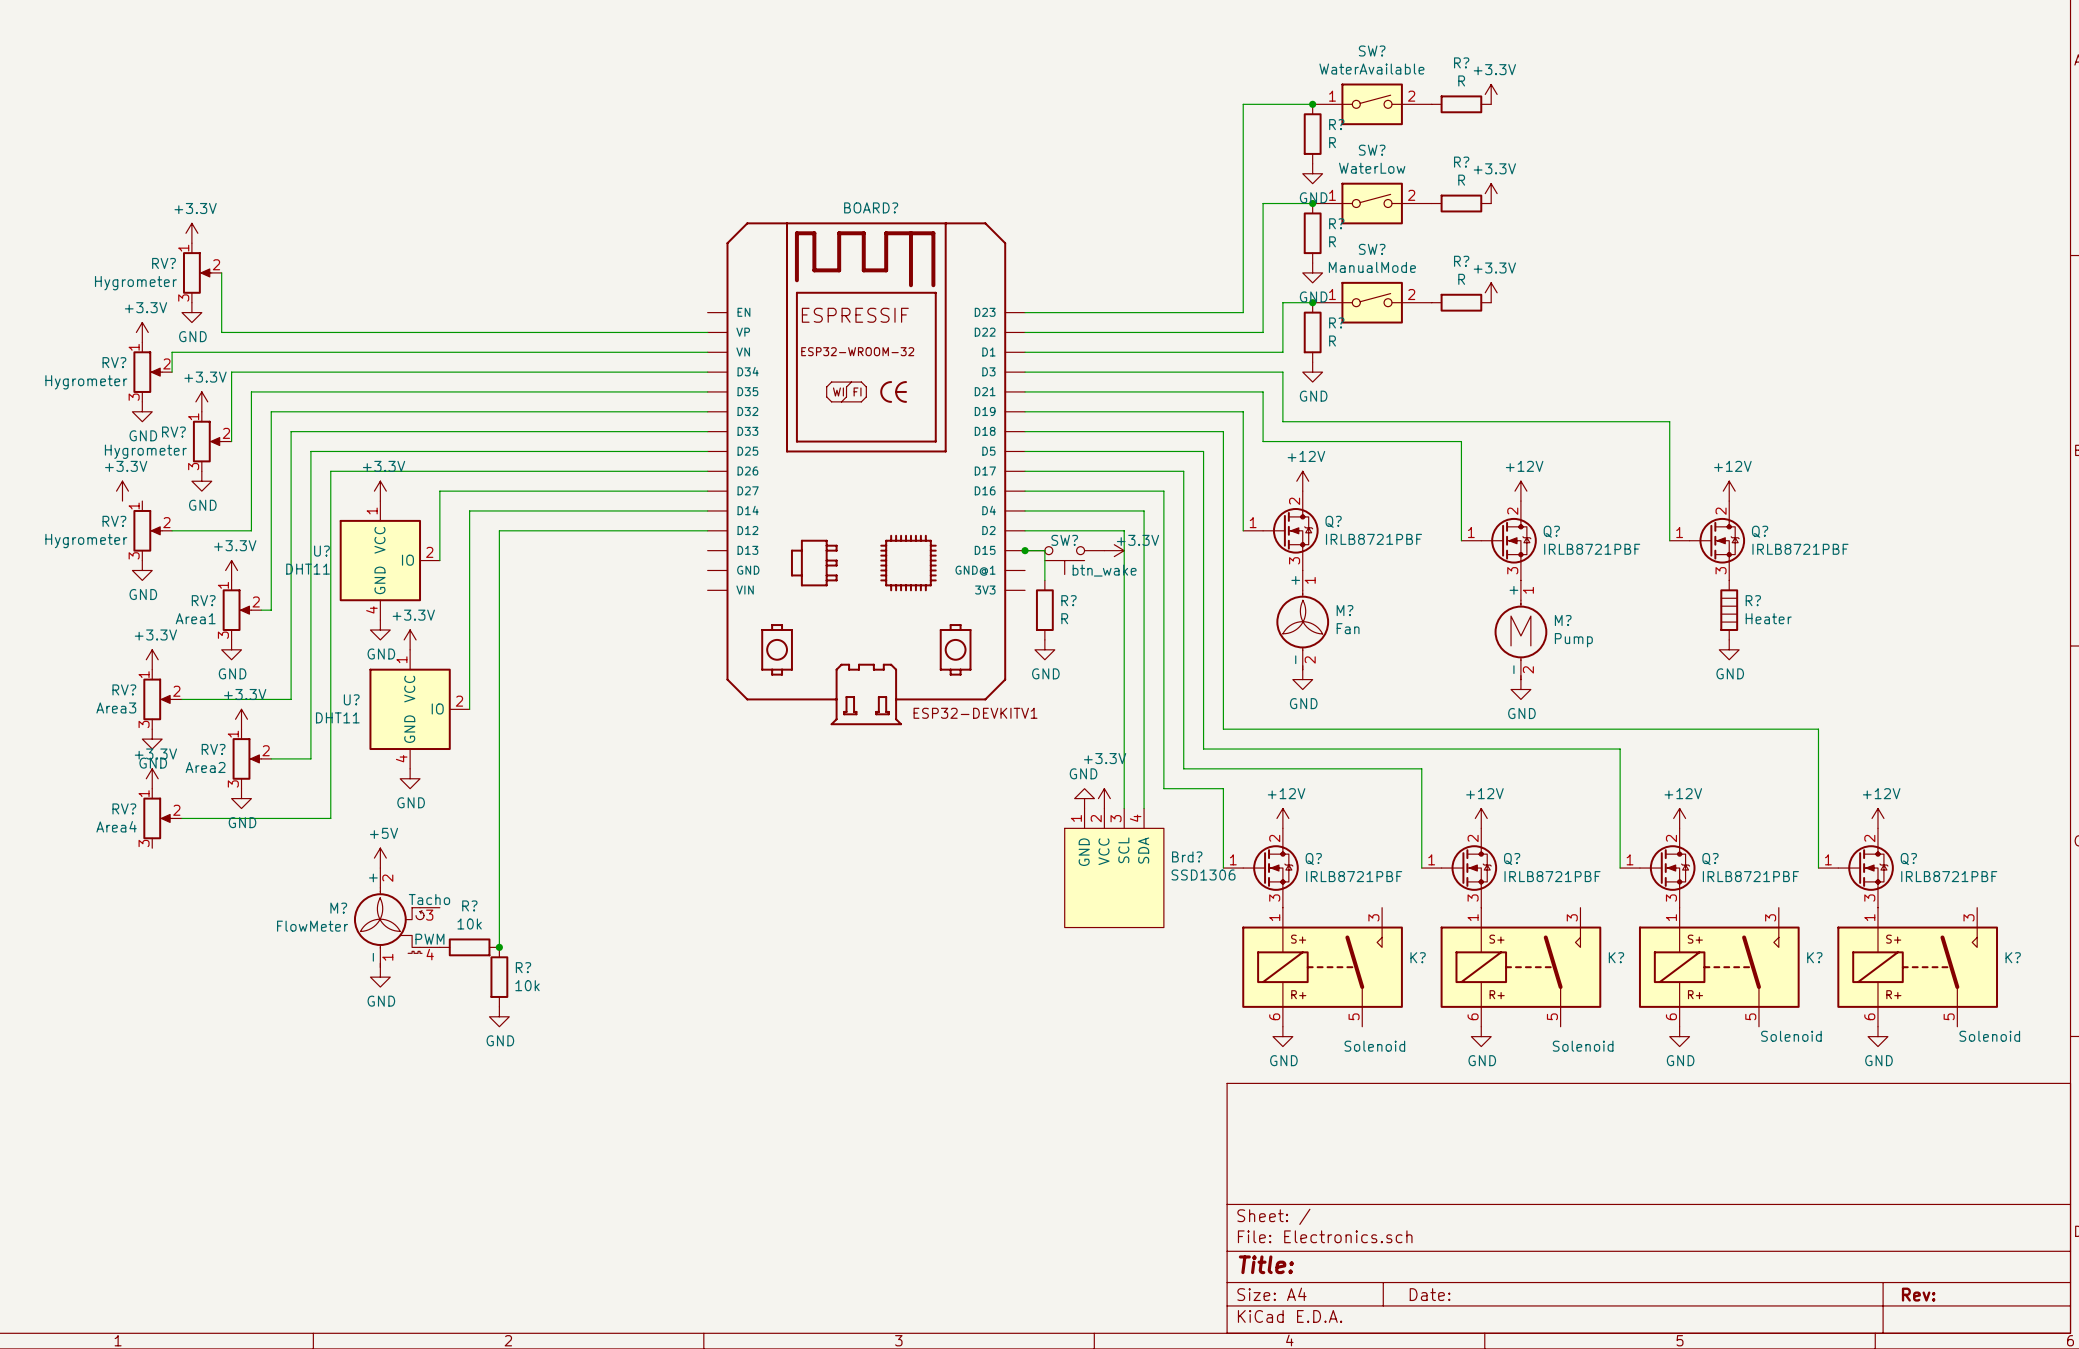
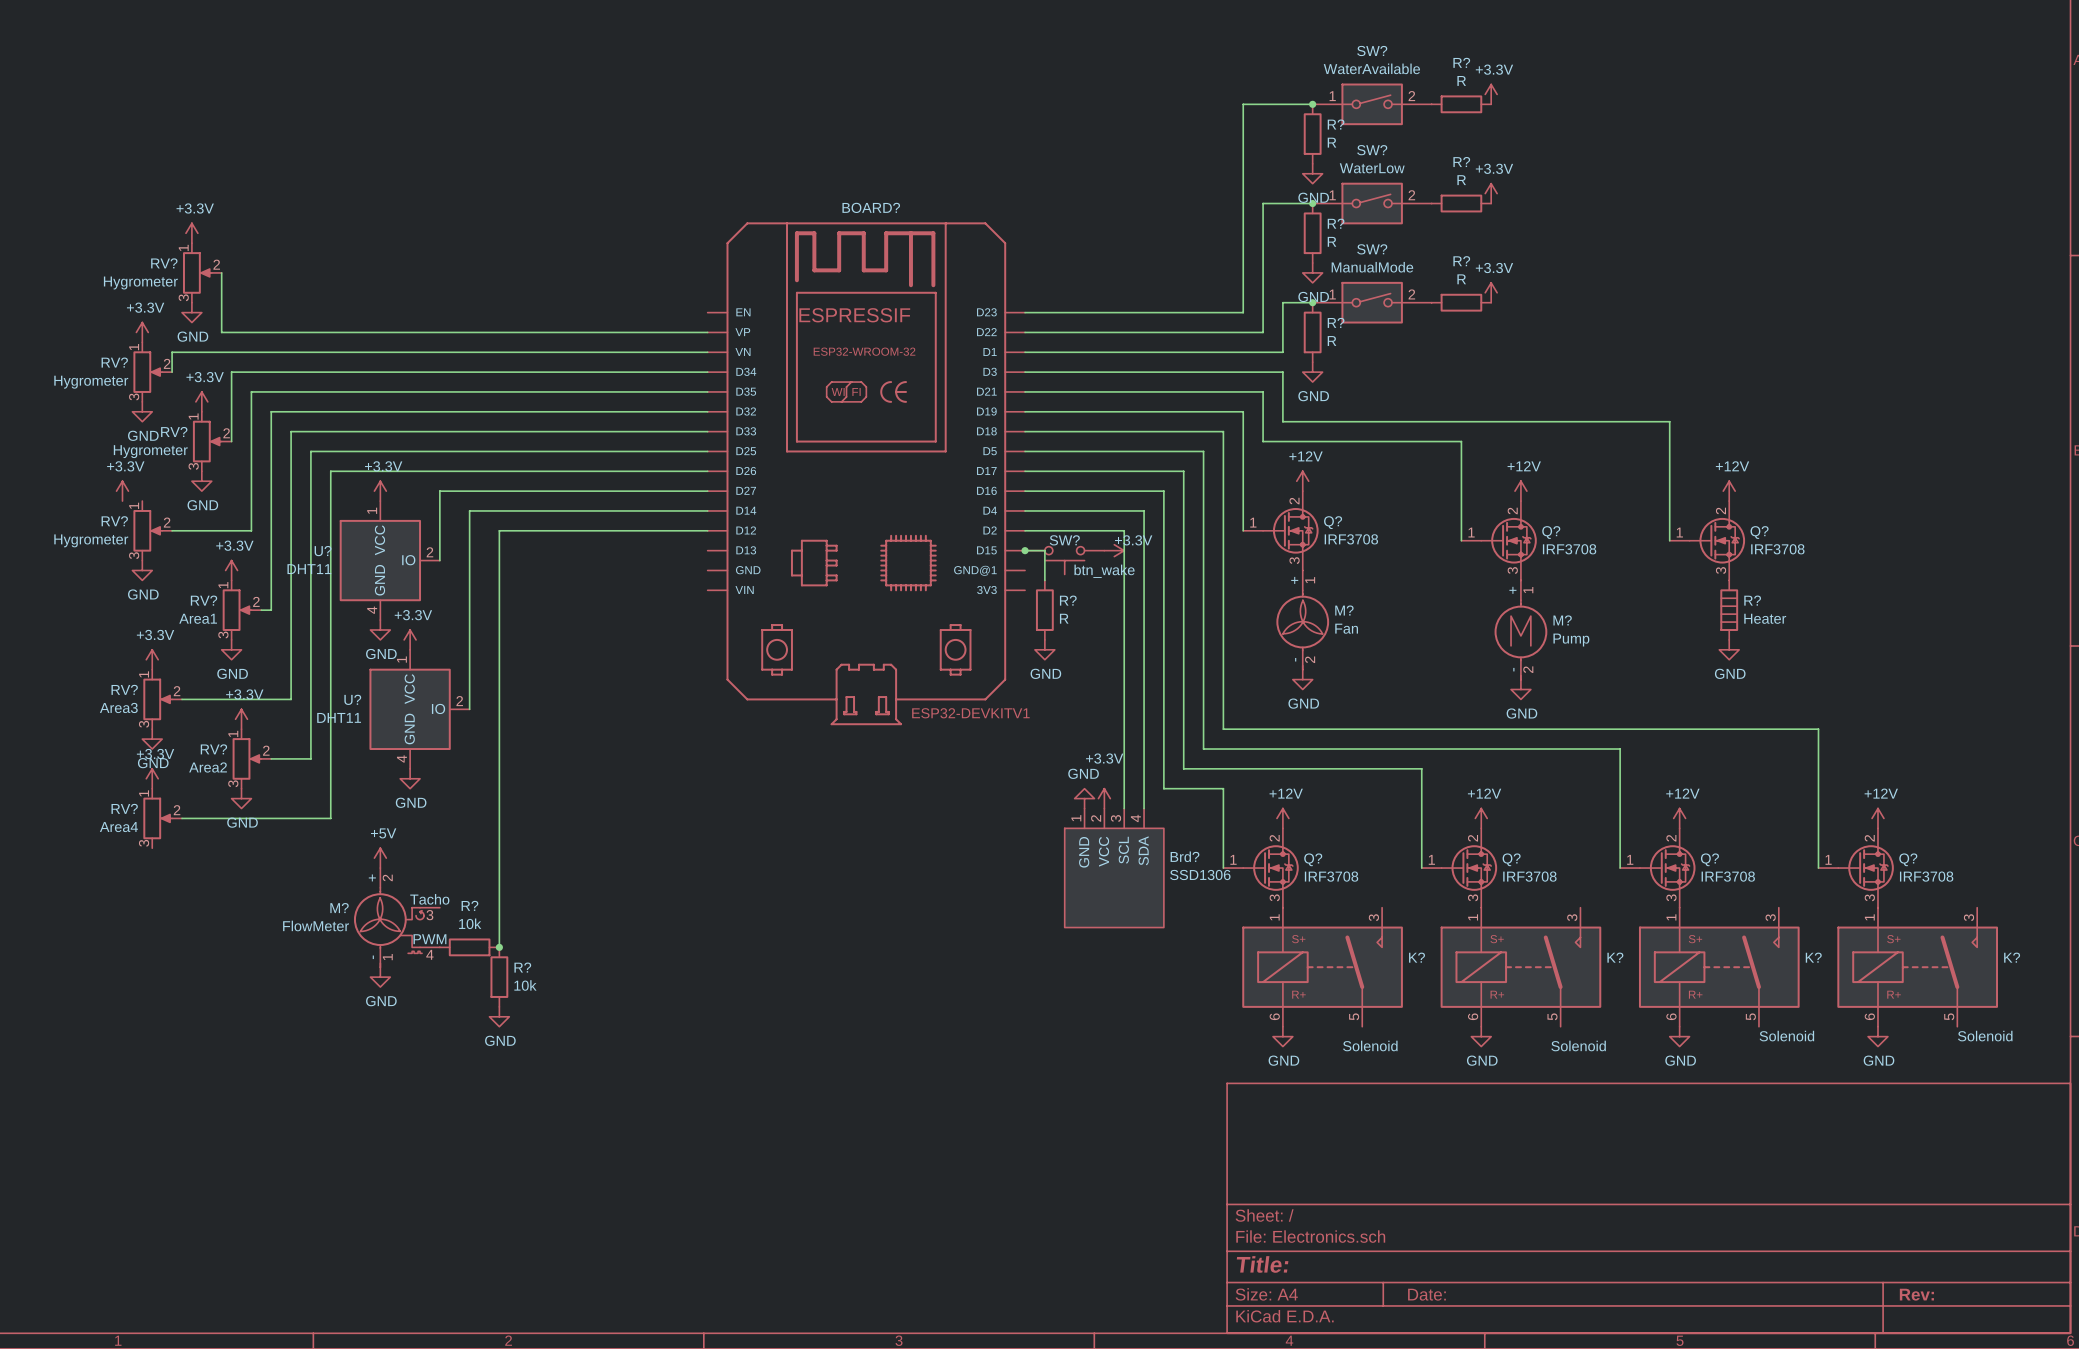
Q? value: IRLB8721PBF (1373, 539) -> IRF3708 (1351, 539)
Q? value: IRLB8721PBF (1592, 549) -> IRF3708 (1569, 549)
Q? value: IRLB8721PBF (1800, 549) -> IRF3708 (1777, 549)
Q? value: IRLB8721PBF (1354, 876) -> IRF3708 (1331, 876)
Q? value: IRLB8721PBF (1552, 876) -> IRF3708 (1529, 876)
Q? value: IRLB8721PBF (1750, 876) -> IRF3708 (1728, 876)
Q? value: IRLB8721PBF (1949, 876) -> IRF3708 (1926, 876)

